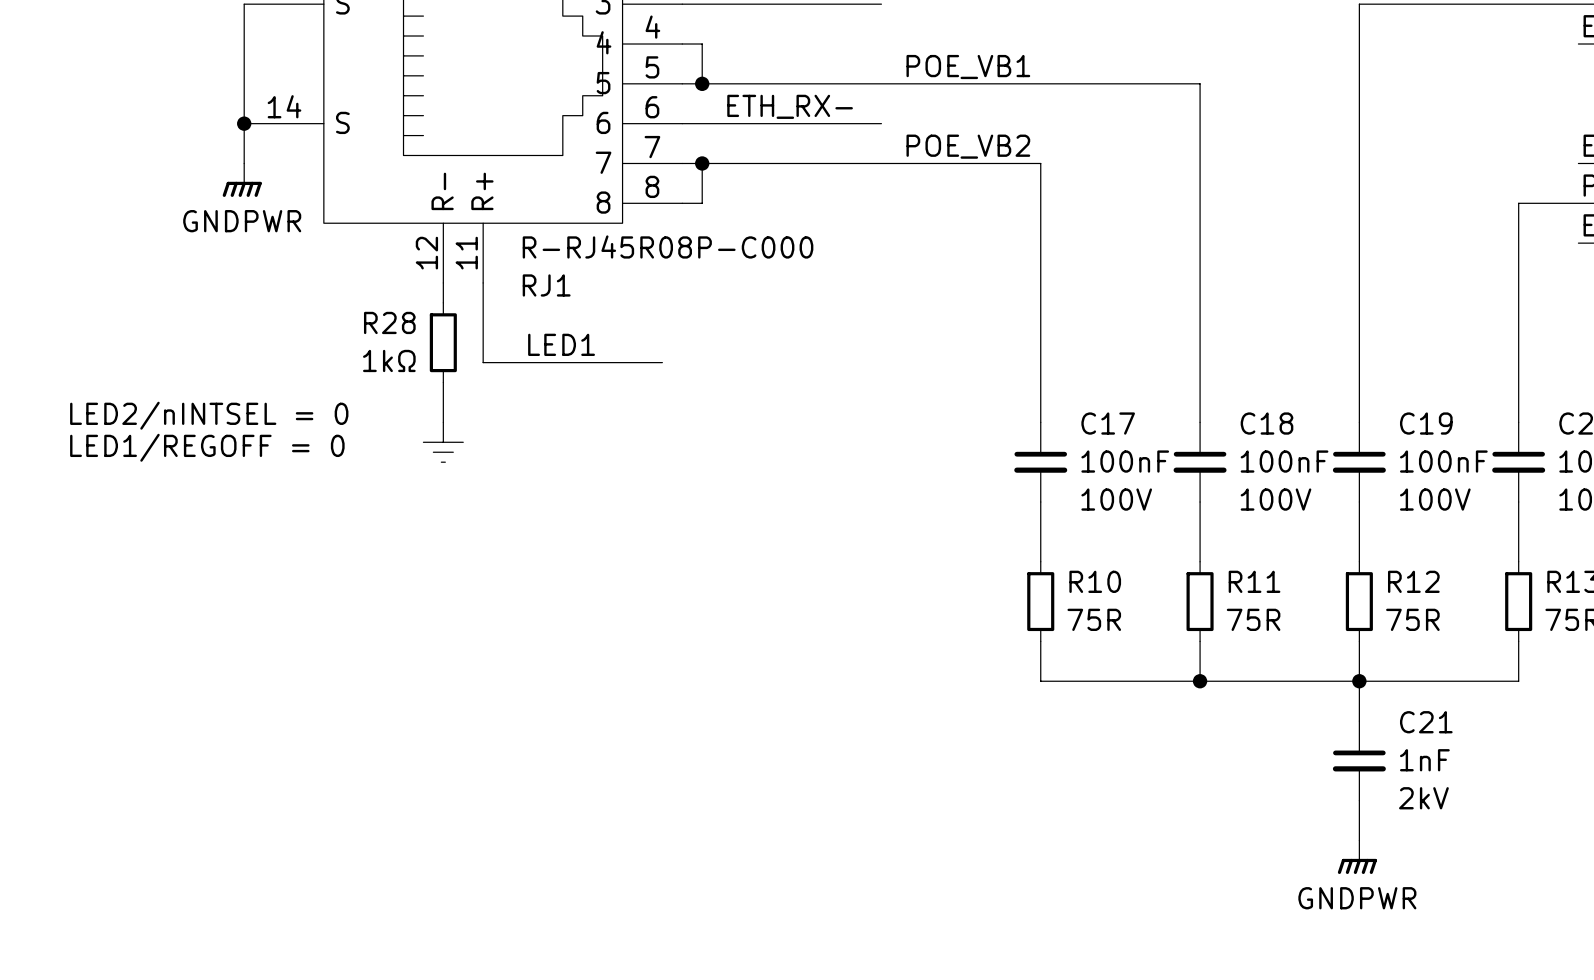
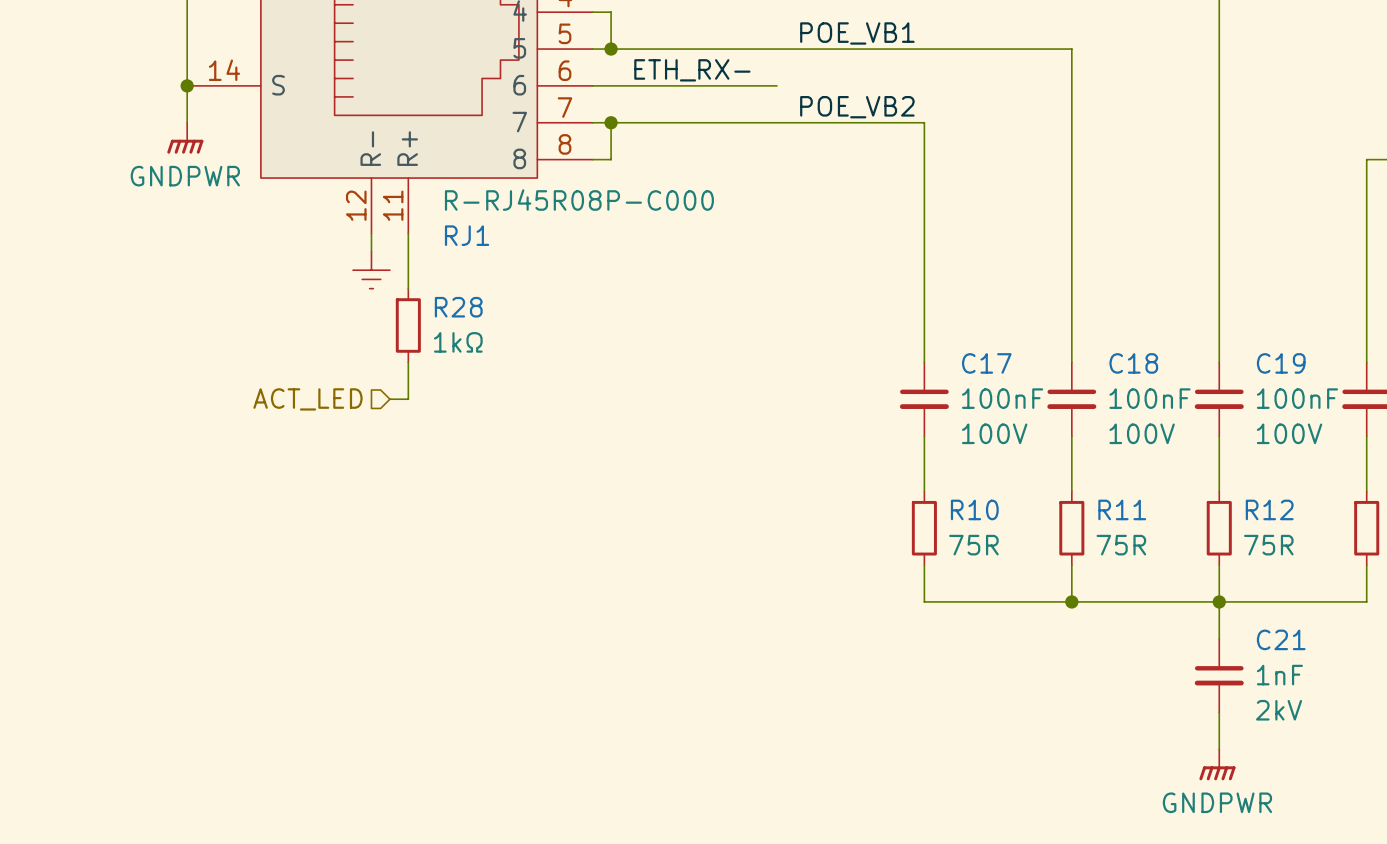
R28 name position: R28 (389, 322) -> R28 (458, 307)
R28 position: (443, 342) -> (408, 325)
wire: (483, 342) (483, 362) (662, 362) -> none
label: LED1 (561, 344) -> none
R28 value position: 1kΩ (389, 360) -> 1kΩ (458, 342)
wire: (443, 382) (443, 422) -> none
text: LED2/nINTSEL = 0 (209, 415) -> none
wire: none -> (408, 362) (408, 399) (389, 399)
power symbol position: (443, 442) -> (371, 270)
text: LED1/REGOFF = 0 (207, 447) -> none
hierarchical label: none -> ACT_LED (307, 399)

